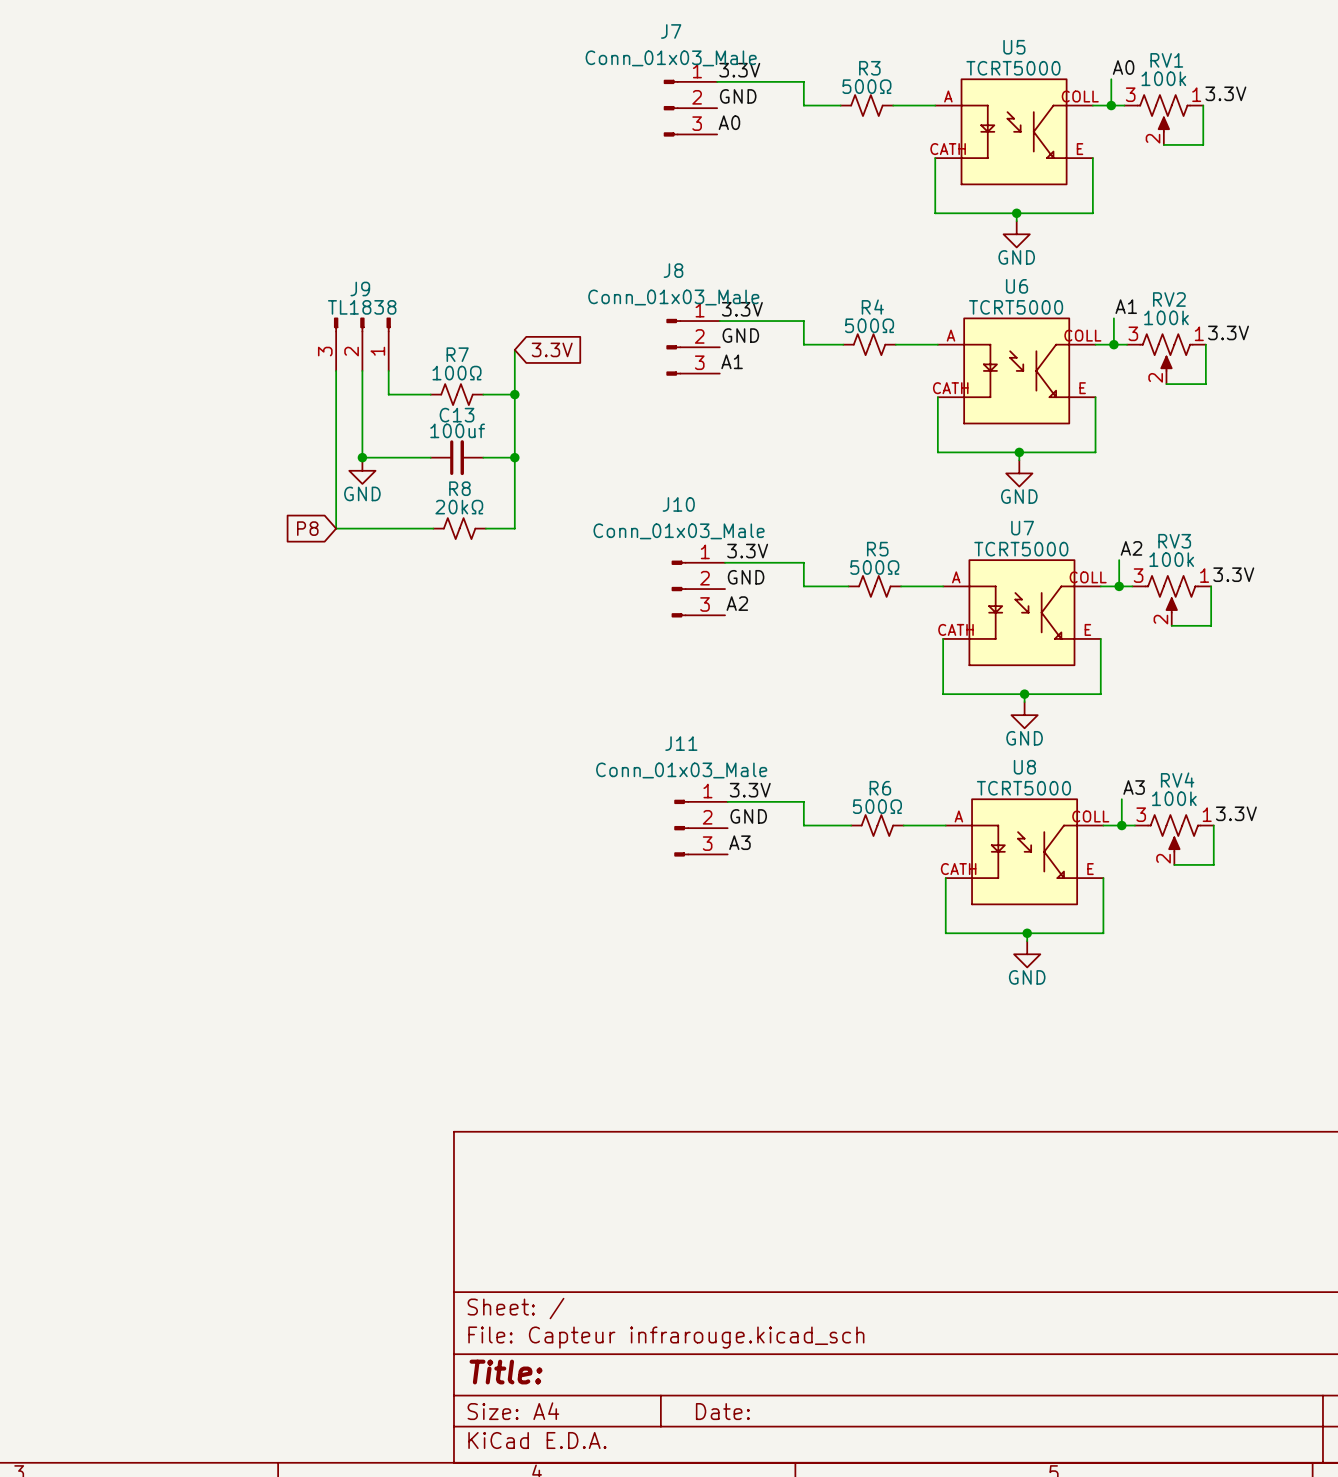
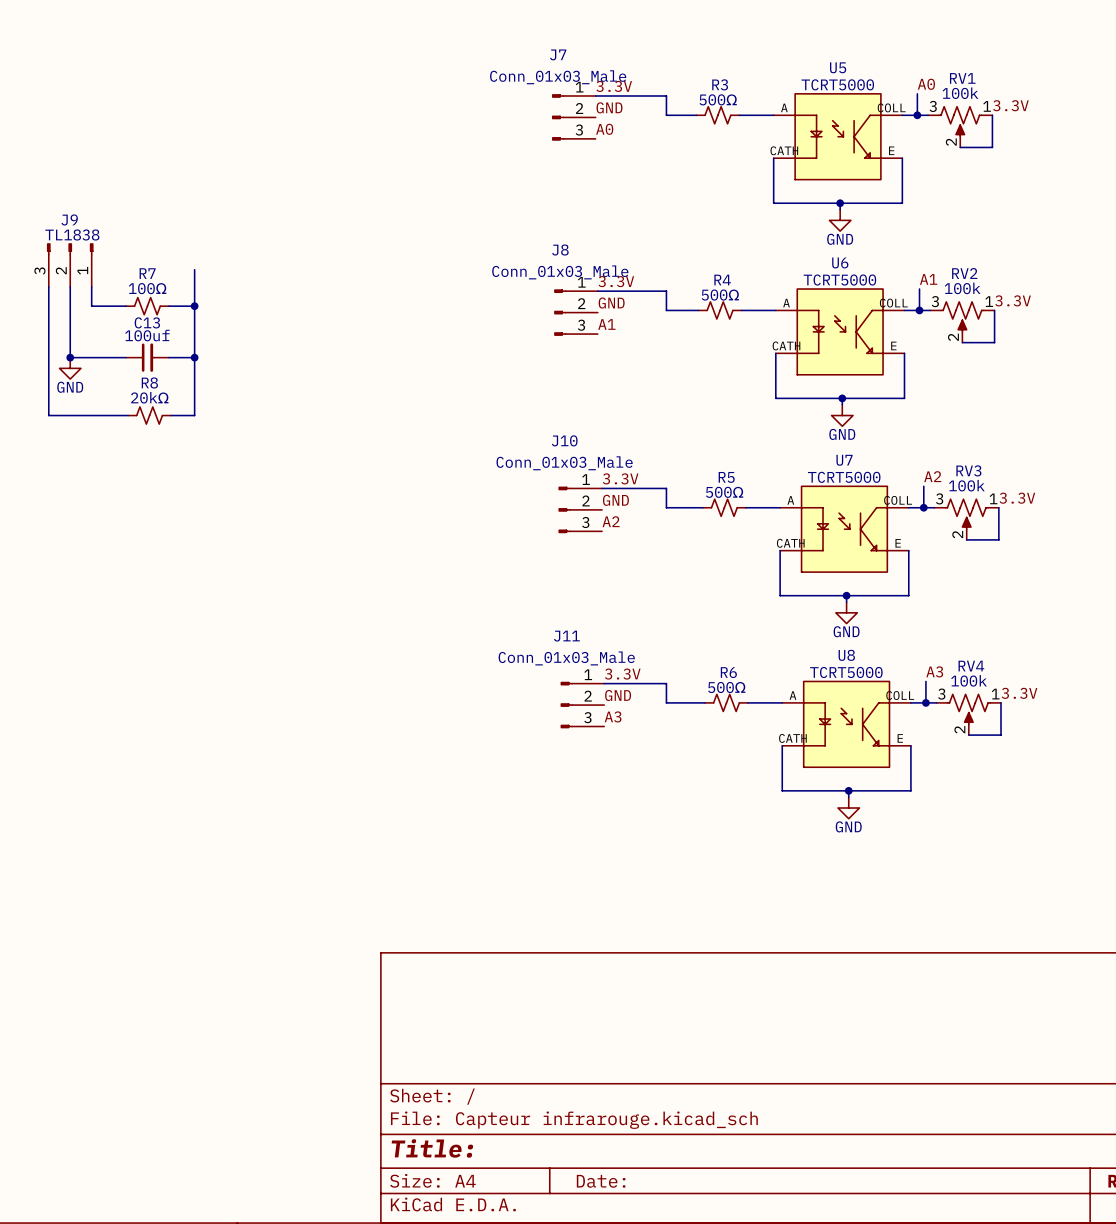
wire: none -> (194, 269) (194, 415) (171, 415)
wire: none -> (48, 286) (48, 415) (128, 415)
wire: none -> (70, 286) (70, 357) (126, 357)
wire: none -> (91, 286) (91, 306) (126, 306)
wire: none -> (168, 306) (194, 306)
junction: none -> (194, 306)
J9 position: (362, 344) -> (70, 265)
wire: (514, 349) (514, 528) (485, 528) -> none
global label: 3.3V (552, 349) -> none
wire: (336, 370) (336, 528) (433, 528) -> none
wire: (362, 370) (362, 457) (430, 457) -> none
wire: (388, 370) (388, 394) (430, 394) -> none
R7 position: (457, 394) -> (147, 306)
wire: (483, 394) (514, 394) -> none
junction: (514, 394) -> none
junction: none -> (70, 357)
wire: none -> (168, 357) (194, 357)
junction: none -> (194, 357)
power symbol: none -> GND (70, 368)
junction: (362, 457) -> none
C13 position: (457, 457) -> (147, 357)
wire: (483, 457) (514, 457) -> none
junction: (514, 457) -> none
power symbol: GND (362, 470) -> none
global label: P8 (307, 528) -> none
R8 position: (459, 528) -> (149, 415)

